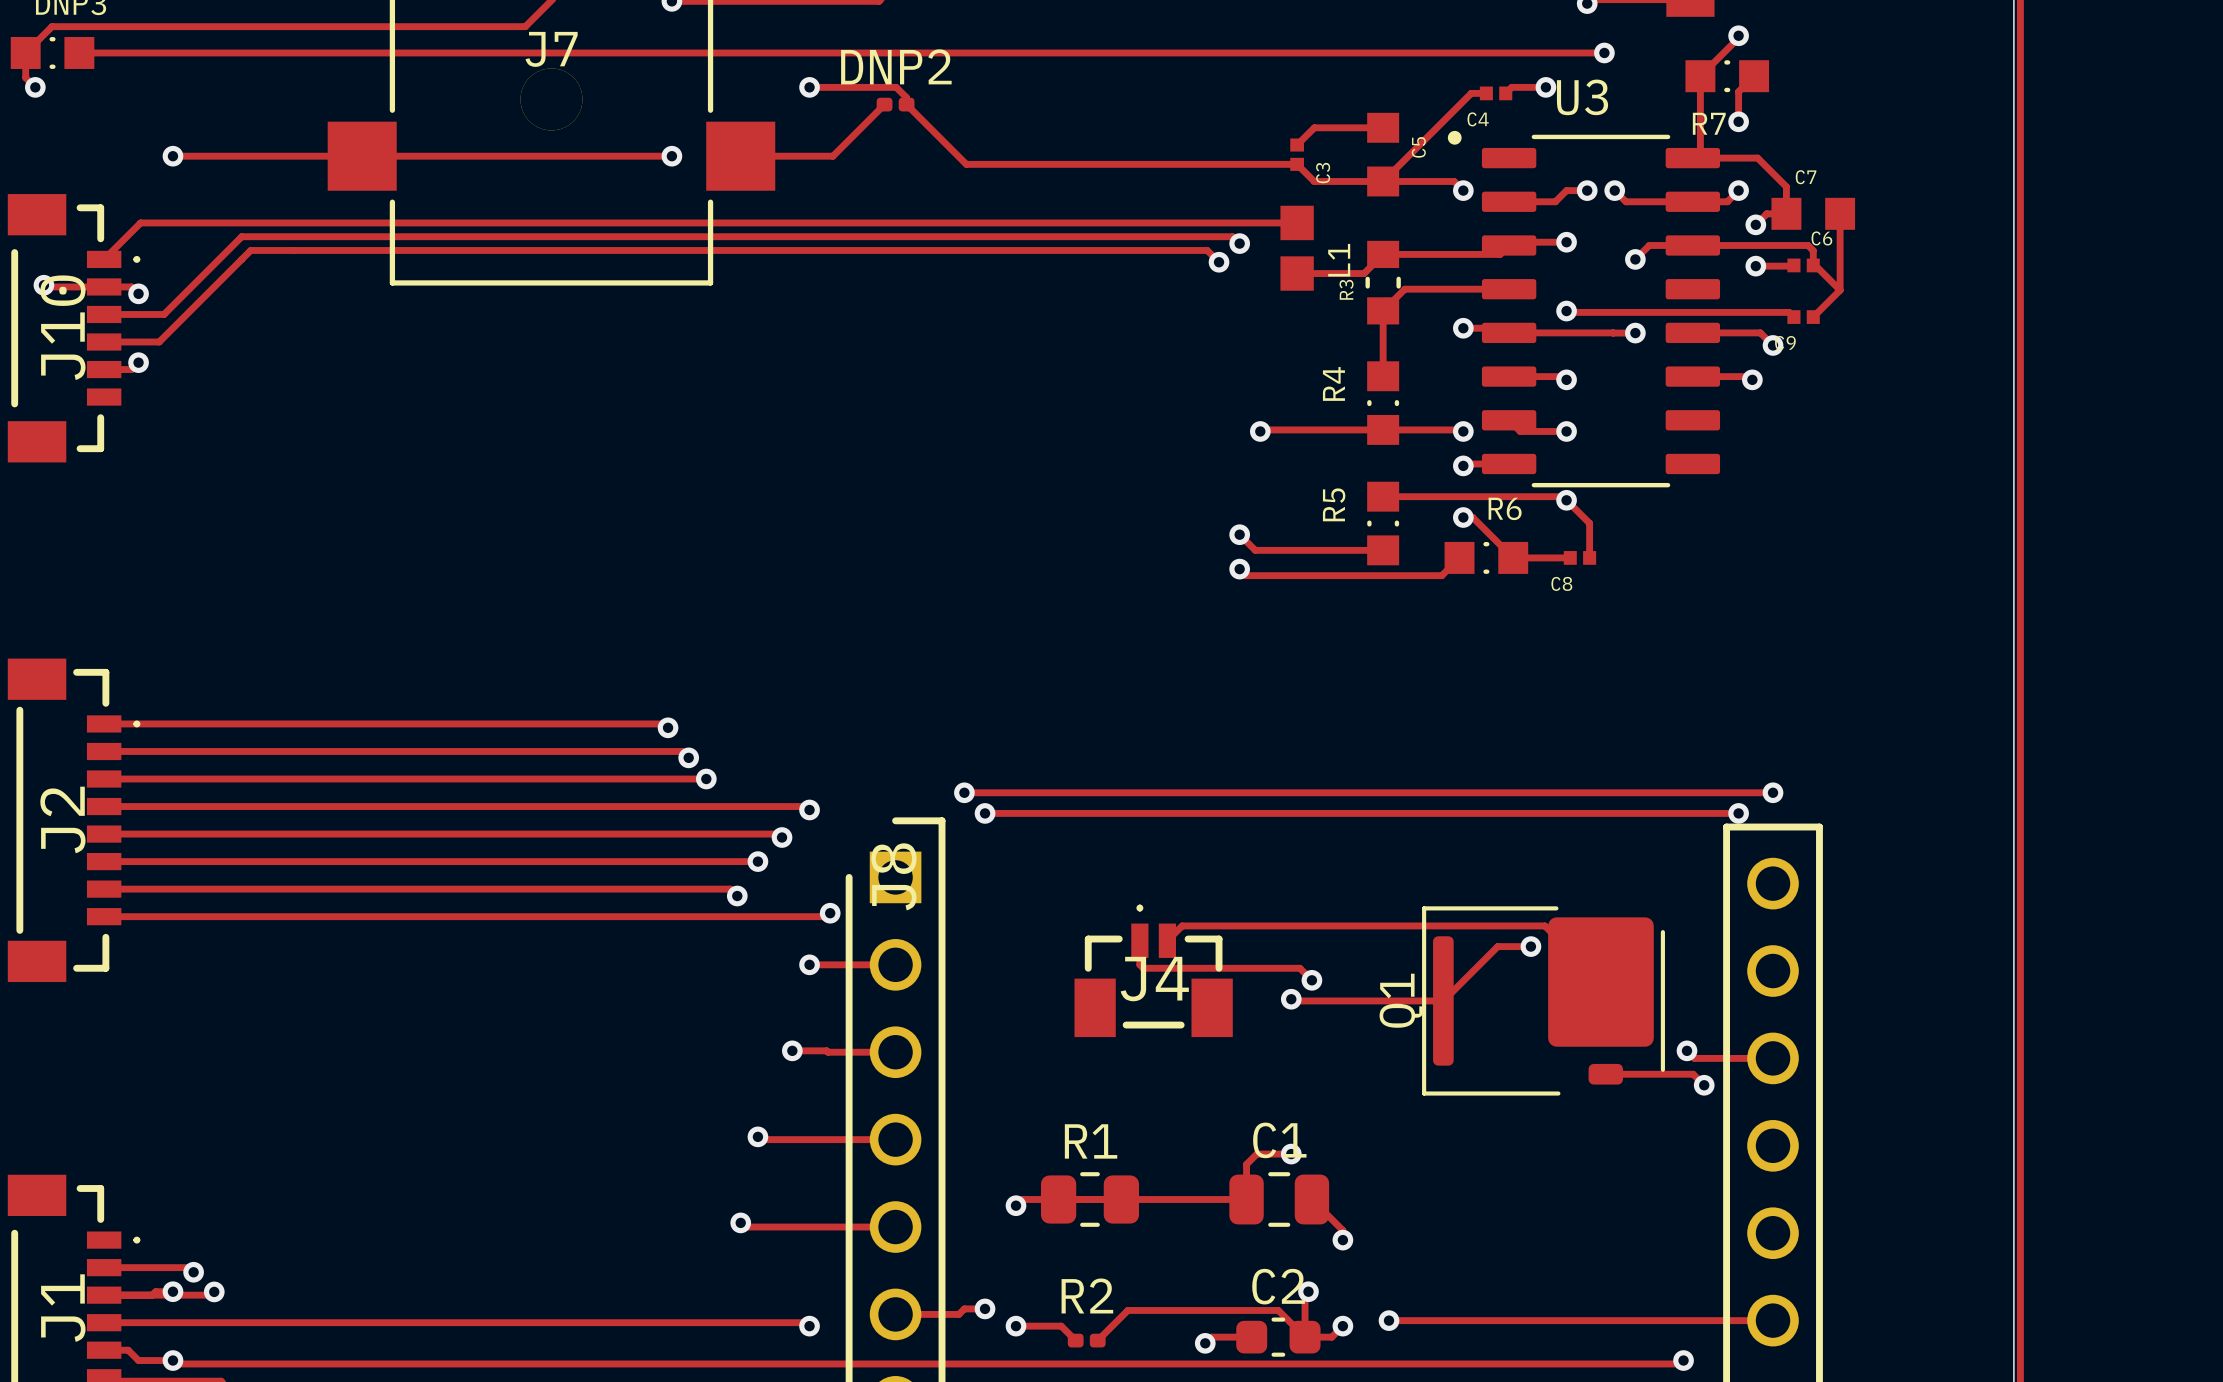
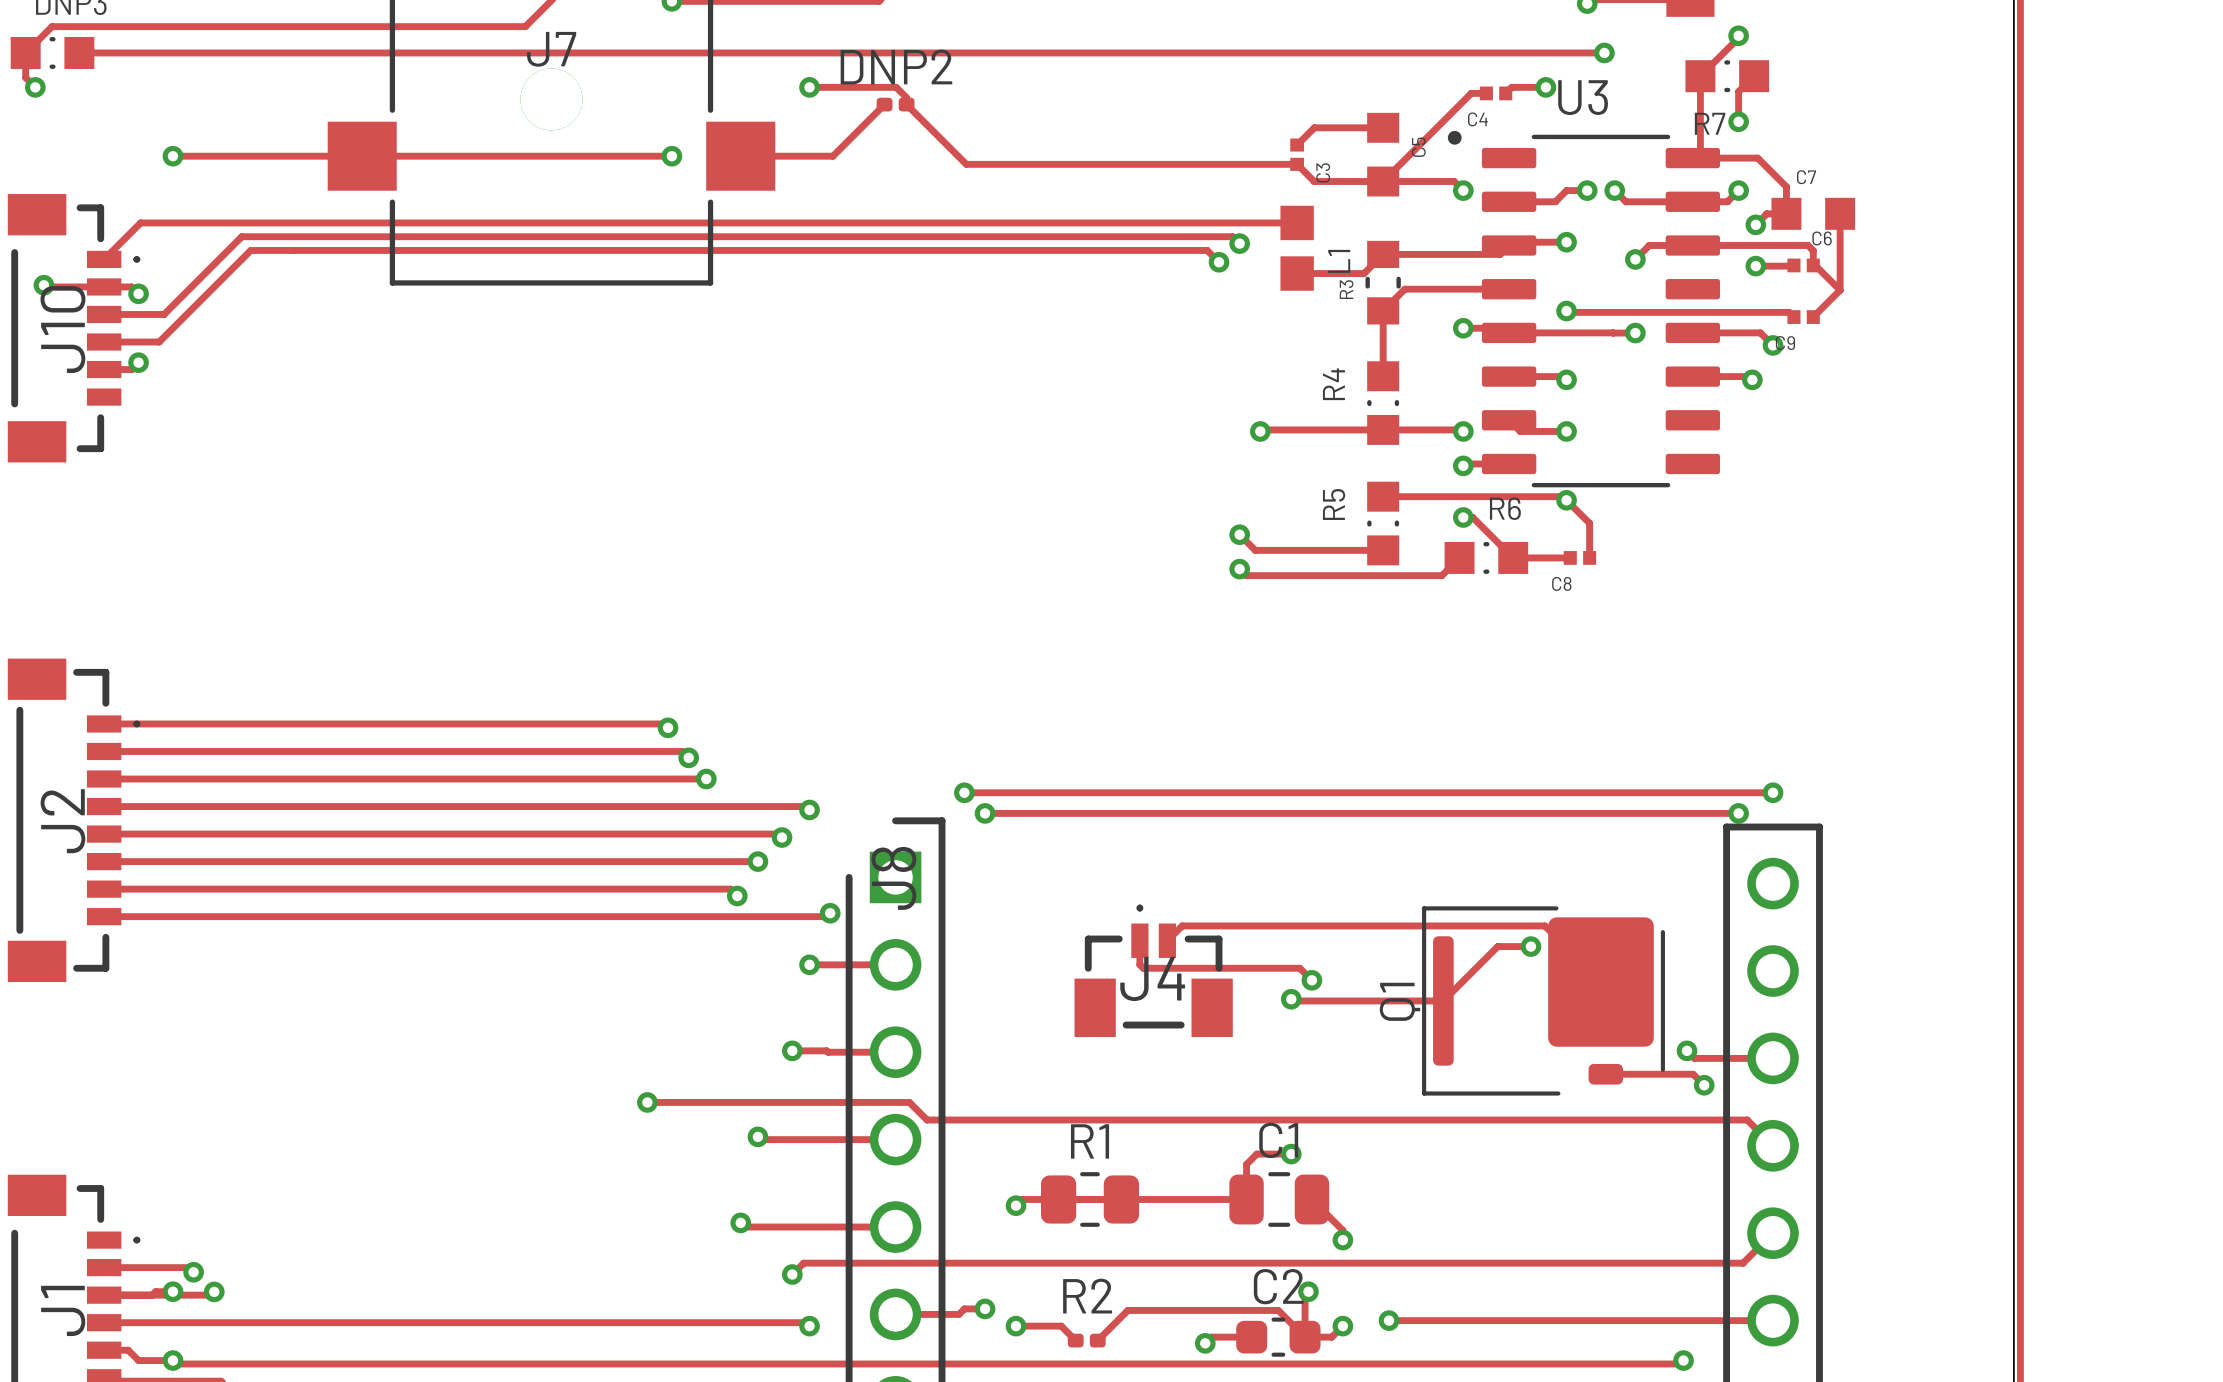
track: none -> (647, 1102) (909, 1102) (927, 1120) (1747, 1120) (1773, 1145)
via: none -> (647, 1102)
track: none -> (1773, 1233) (1743, 1263) (803, 1263) (792, 1274)
via: none -> (792, 1274)

